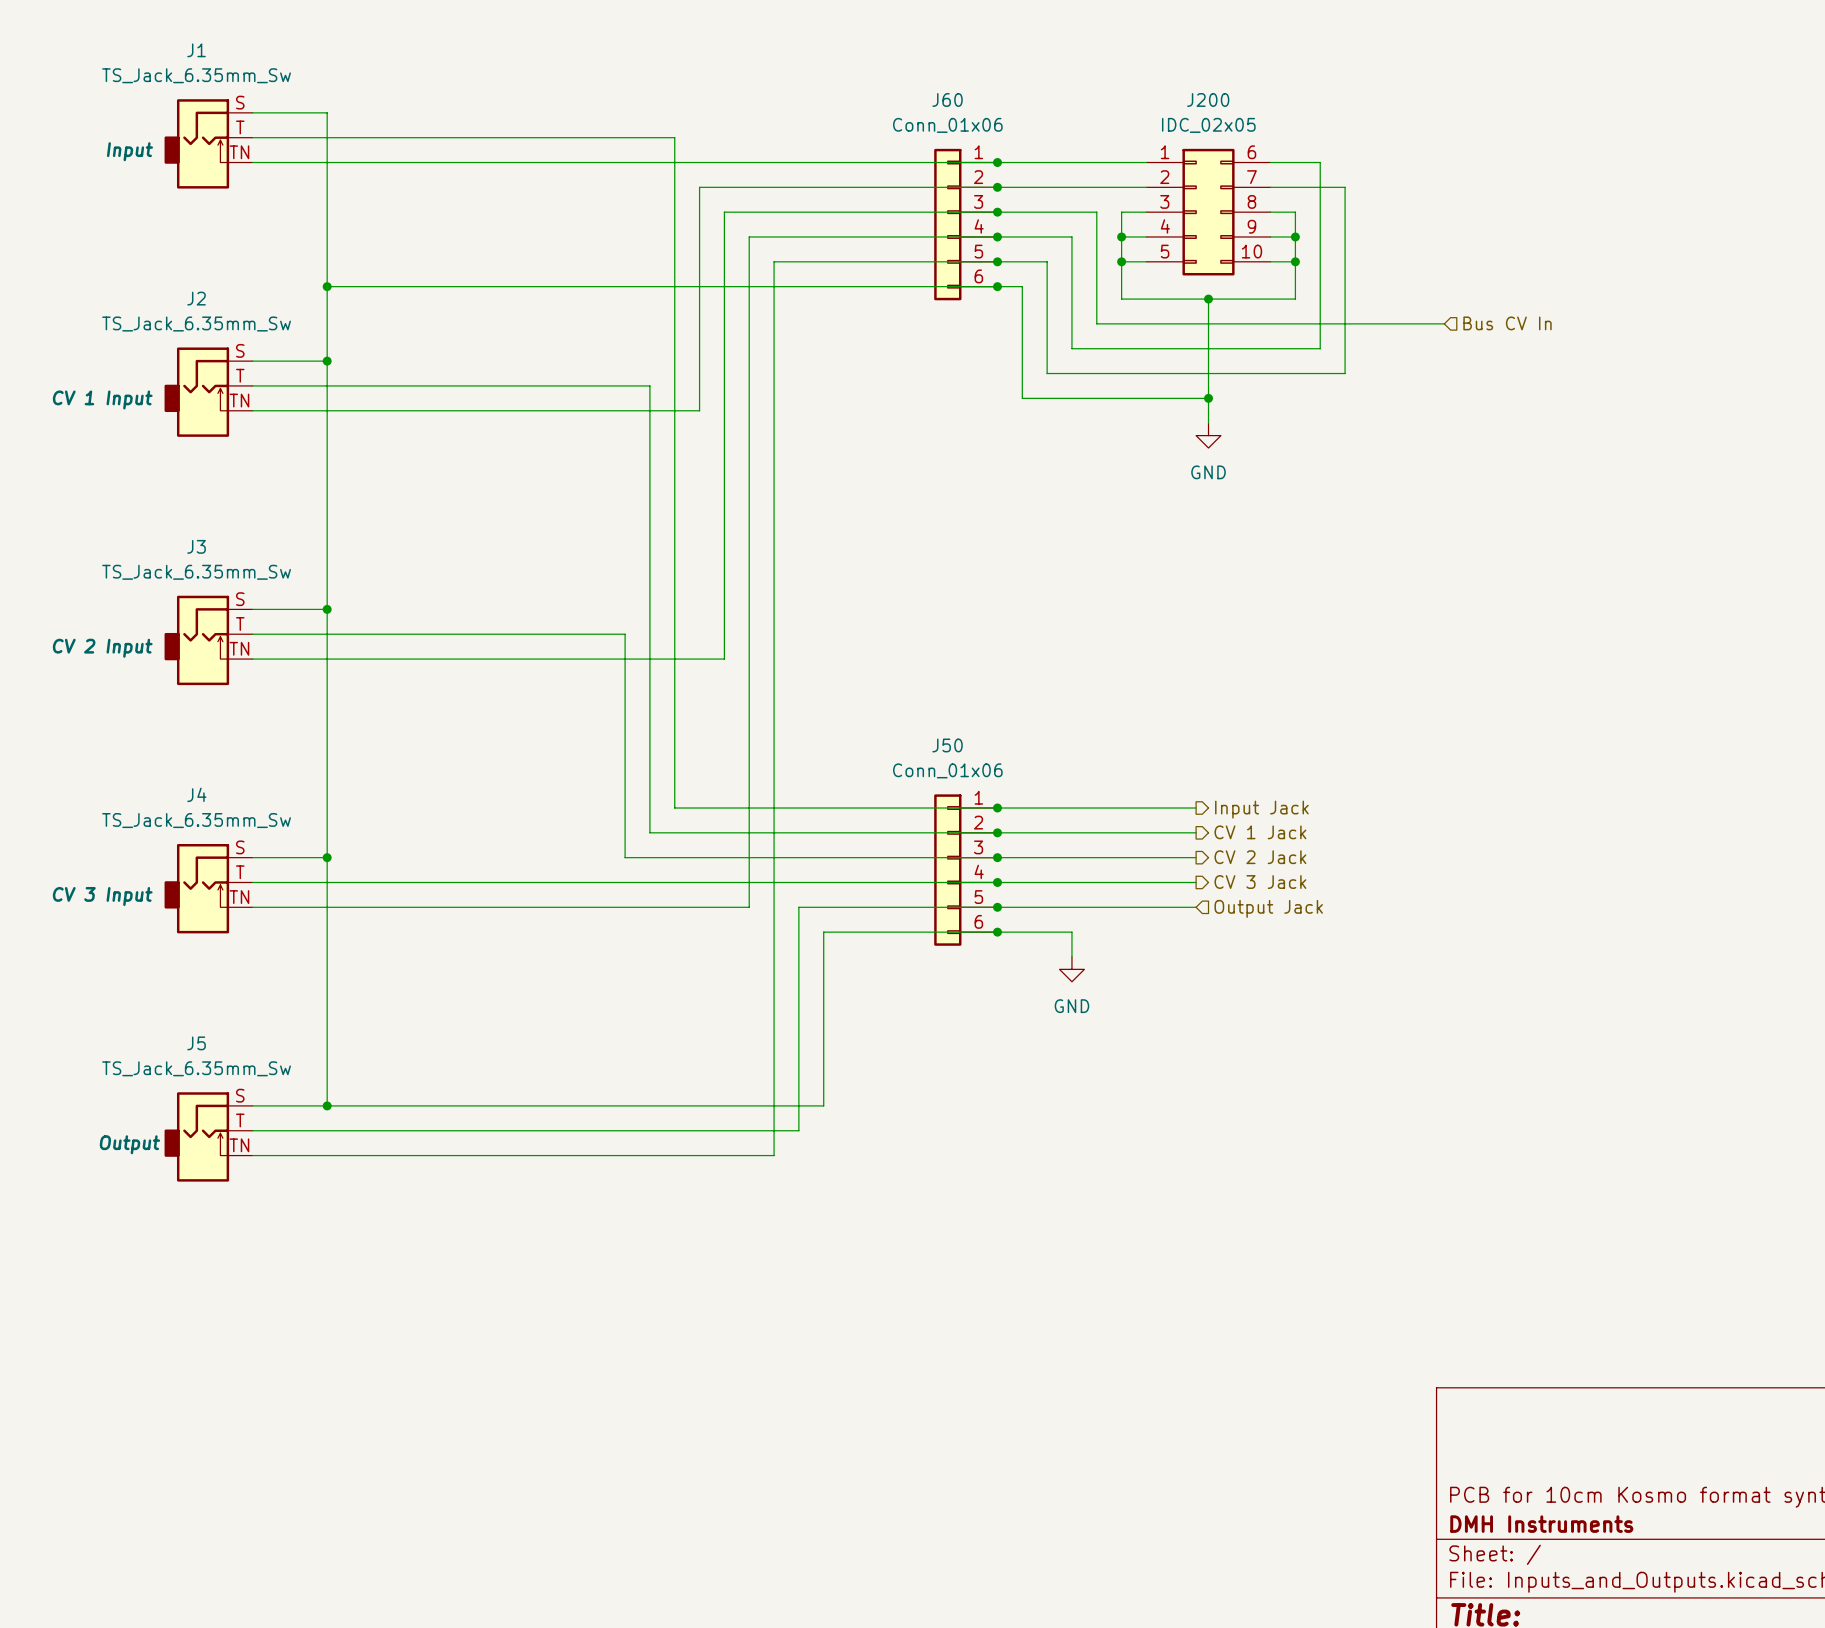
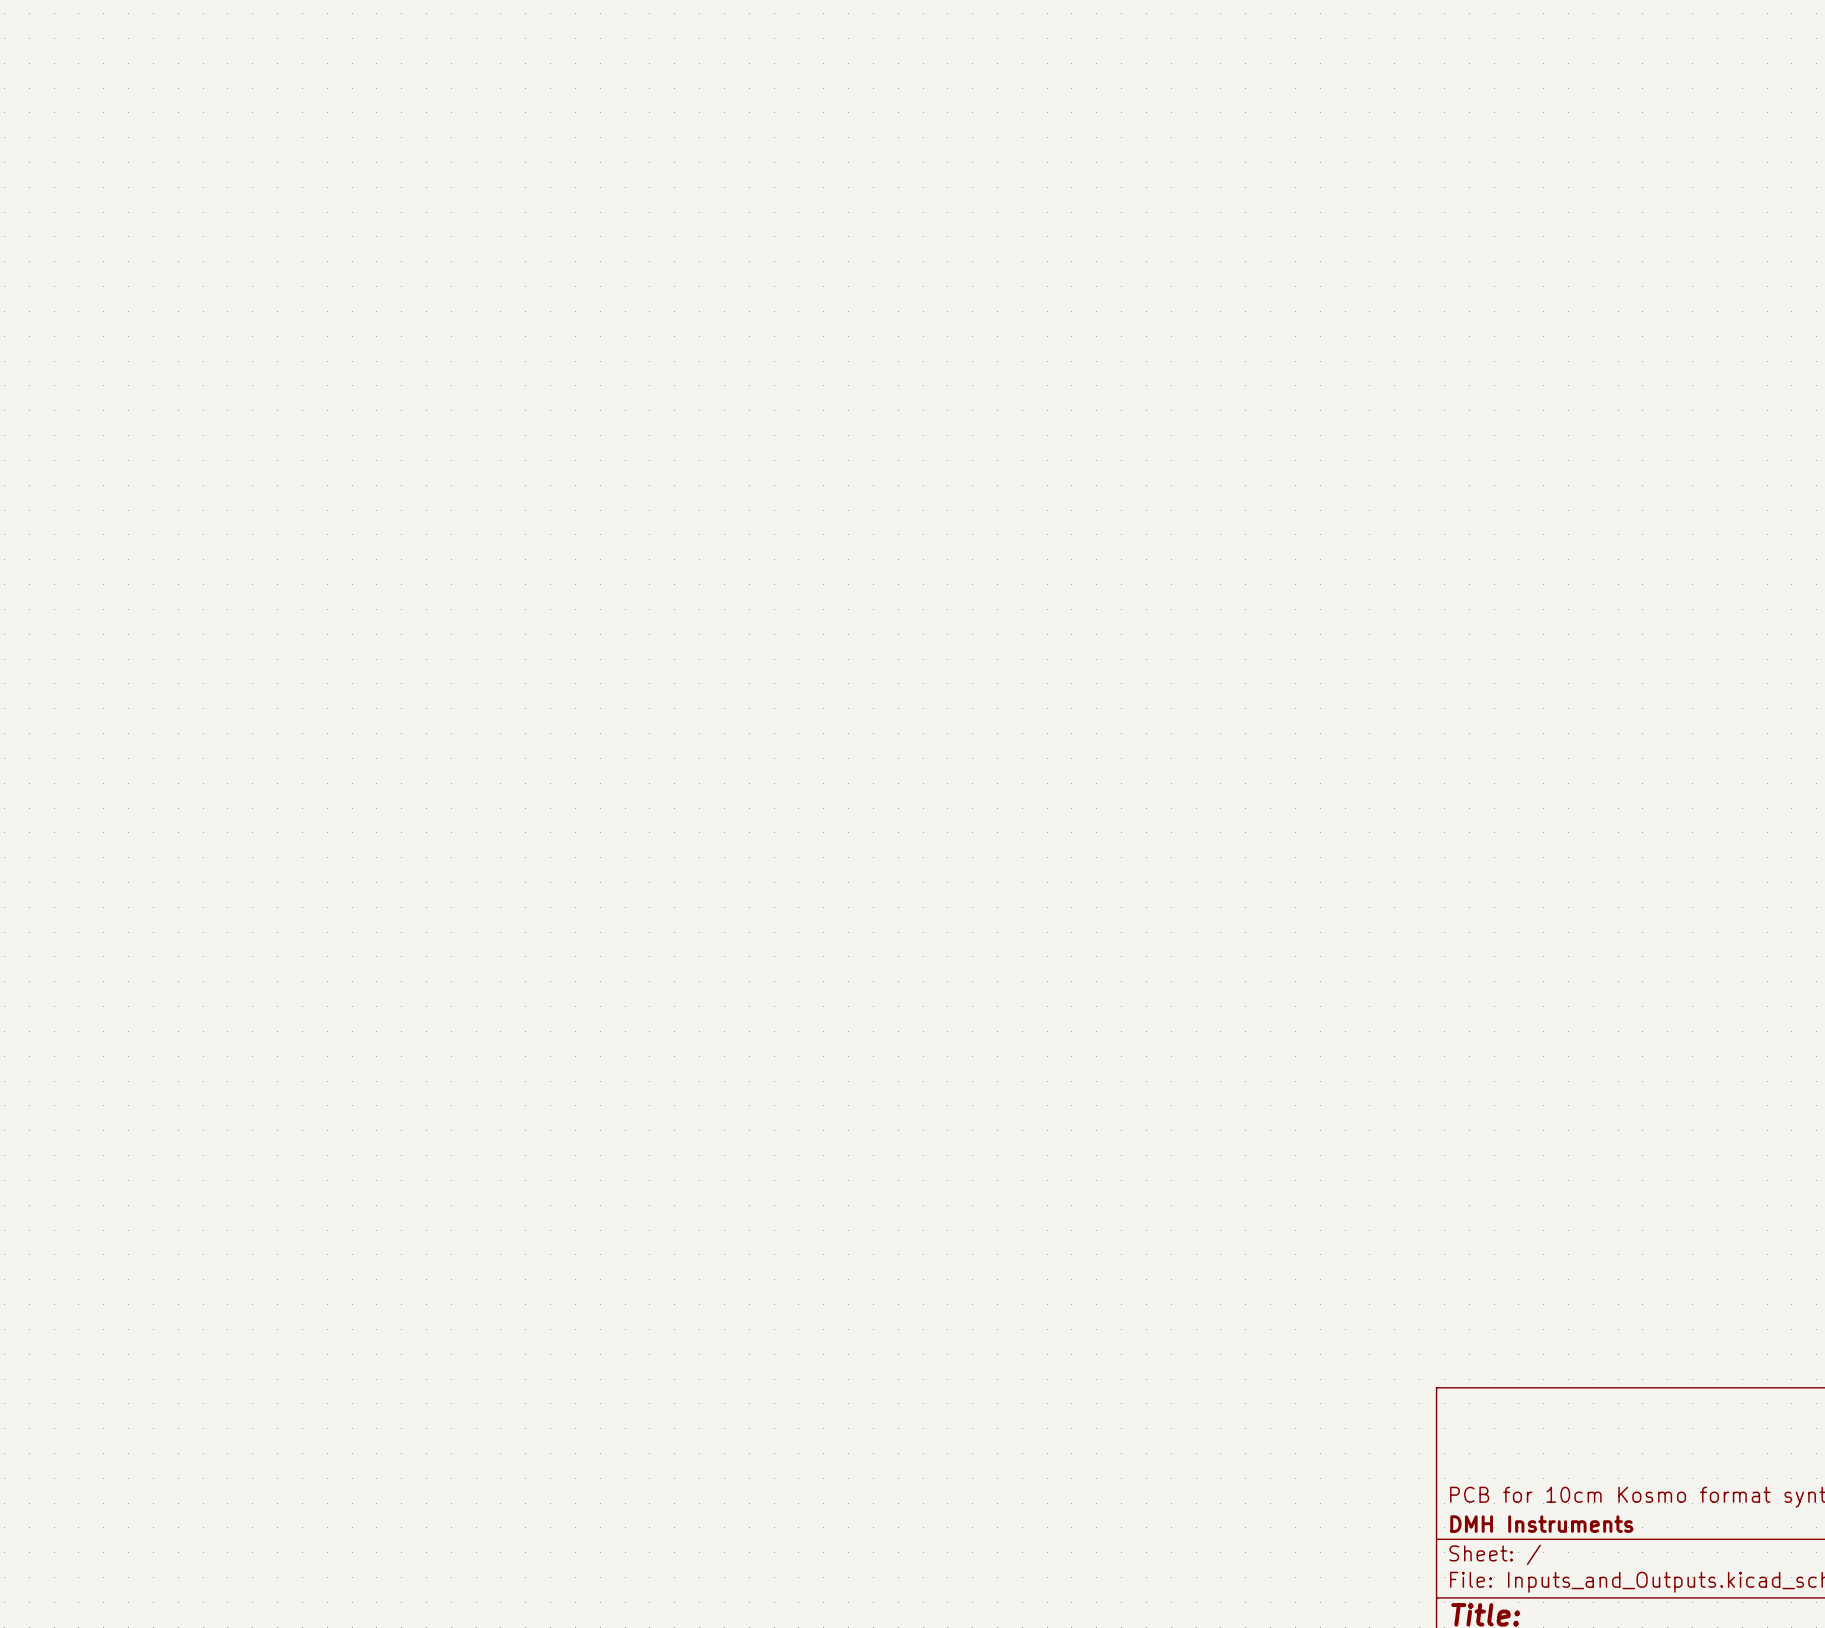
wire: (252, 112) (327, 112) (327, 1105) -> none
wire: (252, 137) (674, 137) (674, 808) (1196, 808) -> none
J1: TS_Jack_6.35mm_Sw (208, 143) -> none
wire: (252, 162) (1146, 162) -> none
junction: (997, 162) -> none
wire: (1270, 162) (1320, 162) (1320, 348) (1071, 348) (1071, 236) (749, 236) (749, 907) (252, 907) -> none
junction: (997, 187) -> none
wire: (1146, 187) (699, 187) (699, 410) (252, 410) -> none
wire: (1270, 187) (1345, 187) (1345, 373) (1047, 373) (1047, 261) (774, 261) (774, 1155) (252, 1155) -> none
junction: (997, 212) -> none
wire: (1146, 212) (1121, 212) (1121, 299) (1295, 299) (1295, 212) (1270, 212) -> none
J200: IDC_02x05 (1208, 212) -> none
J60: Conn_01x06 (965, 224) -> none
junction: (997, 236) -> none
wire: (1121, 236) (1146, 236) -> none
junction: (1121, 236) -> none
wire: (1270, 236) (1295, 236) -> none
junction: (1295, 236) -> none
junction: (997, 261) -> none
wire: (1121, 261) (1146, 261) -> none
junction: (1121, 261) -> none
wire: (1270, 261) (1295, 261) -> none
junction: (1295, 261) -> none
wire: (327, 286) (1022, 286) (1022, 398) (1208, 398) -> none
junction: (327, 286) -> none
junction: (997, 286) -> none
wire: (1208, 299) (1208, 423) -> none
junction: (1208, 299) -> none
wire: (1444, 323) (1096, 323) (1096, 212) (724, 212) (724, 659) (252, 659) -> none
hierarchical label: Bus CV In (1507, 323) -> none
wire: (252, 361) (327, 361) -> none
junction: (327, 361) -> none
wire: (252, 385) (649, 385) (649, 832) (1196, 832) -> none
J2: TS_Jack_6.35mm_Sw (208, 392) -> none
junction: (1208, 398) -> none
power symbol: GND (1208, 435) -> none
wire: (252, 609) (327, 609) -> none
junction: (327, 609) -> none
wire: (252, 634) (625, 634) (625, 857) (1196, 857) -> none
J3: TS_Jack_6.35mm_Sw (208, 640) -> none
junction: (997, 808) -> none
hierarchical label: Input Jack (1261, 809) -> none
junction: (997, 832) -> none
hierarchical label: CV 1 Jack (1260, 832) -> none
wire: (252, 857) (327, 857) -> none
junction: (327, 857) -> none
junction: (997, 857) -> none
hierarchical label: CV 2 Jack (1260, 857) -> none
J50: Conn_01x06 (965, 870) -> none
wire: (252, 882) (1196, 882) -> none
junction: (997, 882) -> none
hierarchical label: CV 3 Jack (1260, 882) -> none
J4: TS_Jack_6.35mm_Sw (208, 888) -> none
junction: (997, 907) -> none
wire: (1196, 907) (798, 907) (798, 1130) (252, 1130) -> none
hierarchical label: Output Jack (1268, 908) -> none
junction: (997, 932) -> none
wire: (1071, 956) (1071, 932) (823, 932) (823, 1105) (252, 1105) -> none
power symbol: GND (1071, 969) -> none
junction: (327, 1105) -> none
J5: TS_Jack_6.35mm_Sw (208, 1136) -> none

